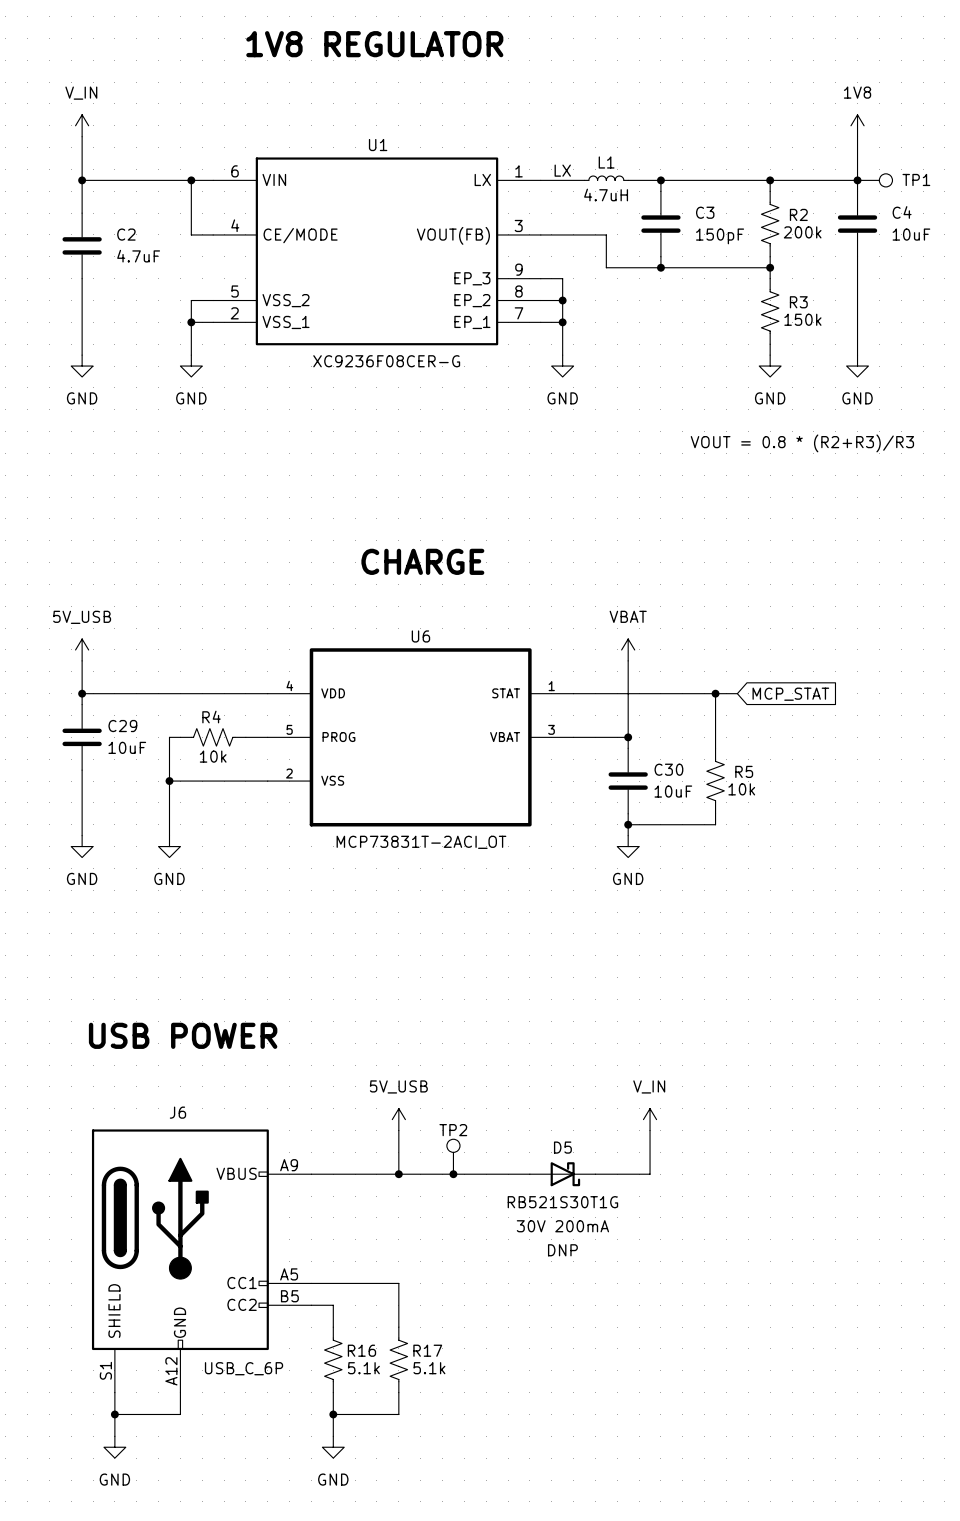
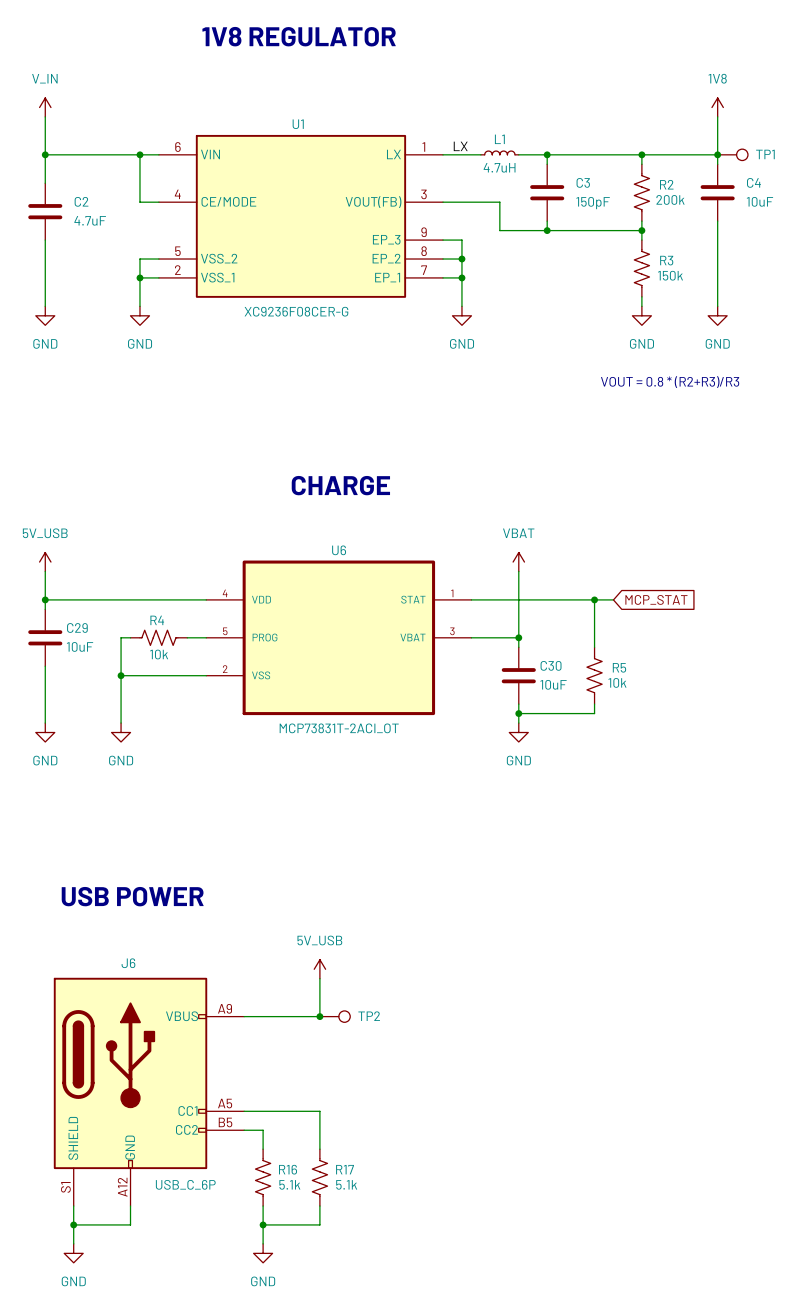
power symbol: V_IN (650, 1119) -> none
TP2 name position: TP2 (453, 1130) -> TP2 (369, 1016)
wire: (650, 1130) (650, 1174) (595, 1174) -> none
TP2 rotation: 0° (453, 1145) -> 90° clockwise (344, 1016)
TP2 position: (453, 1156) -> (335, 1016)
wire: (398, 1174) (529, 1174) -> none
junction: (453, 1174) -> none
D5: RB521S30T1G (562, 1174) -> none
text: 30V 200mA (562, 1226) -> none
text: DNP (562, 1250) -> none

